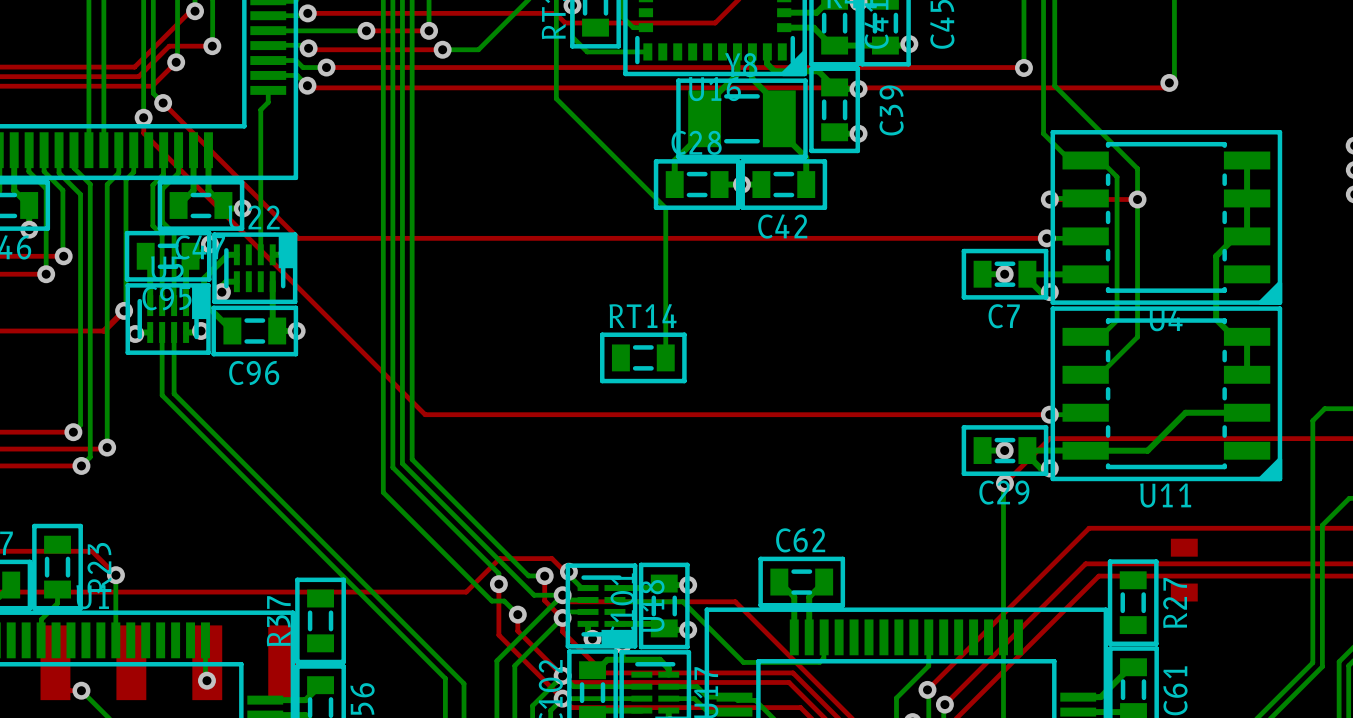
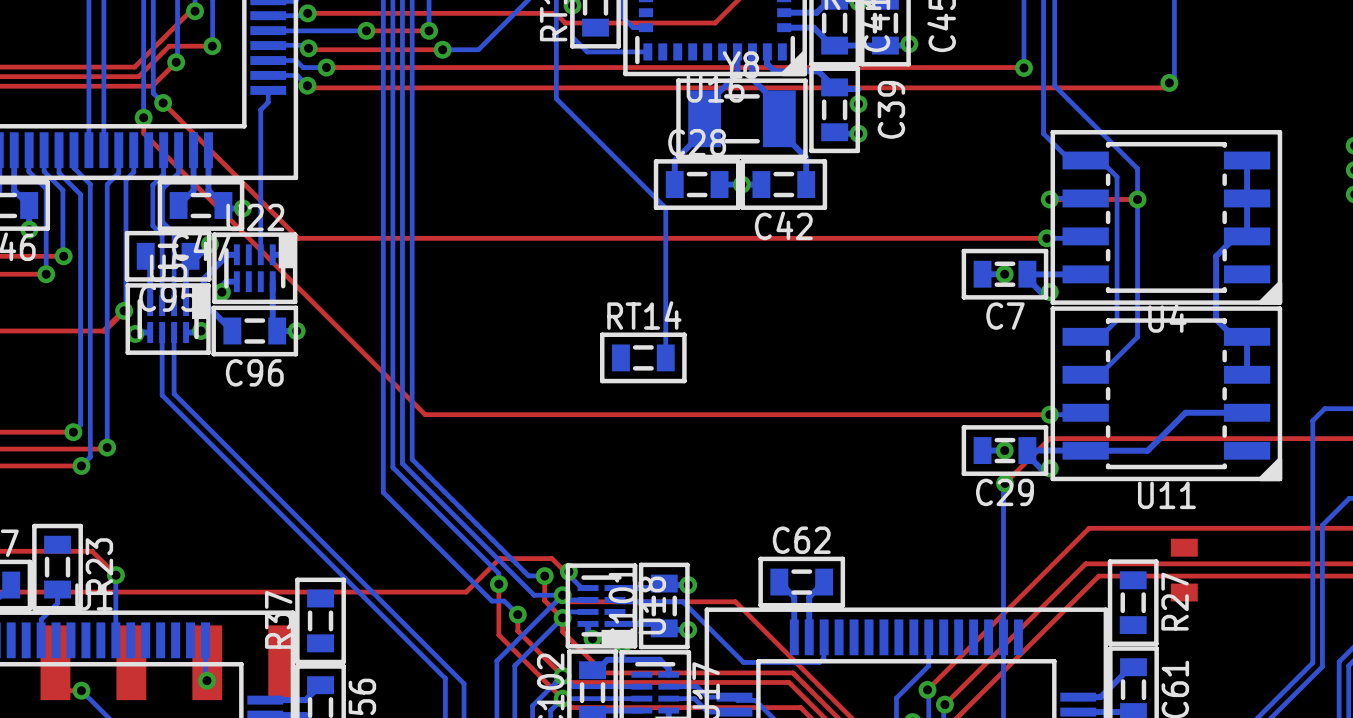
via position: (858, 89) -> (858, 104)

